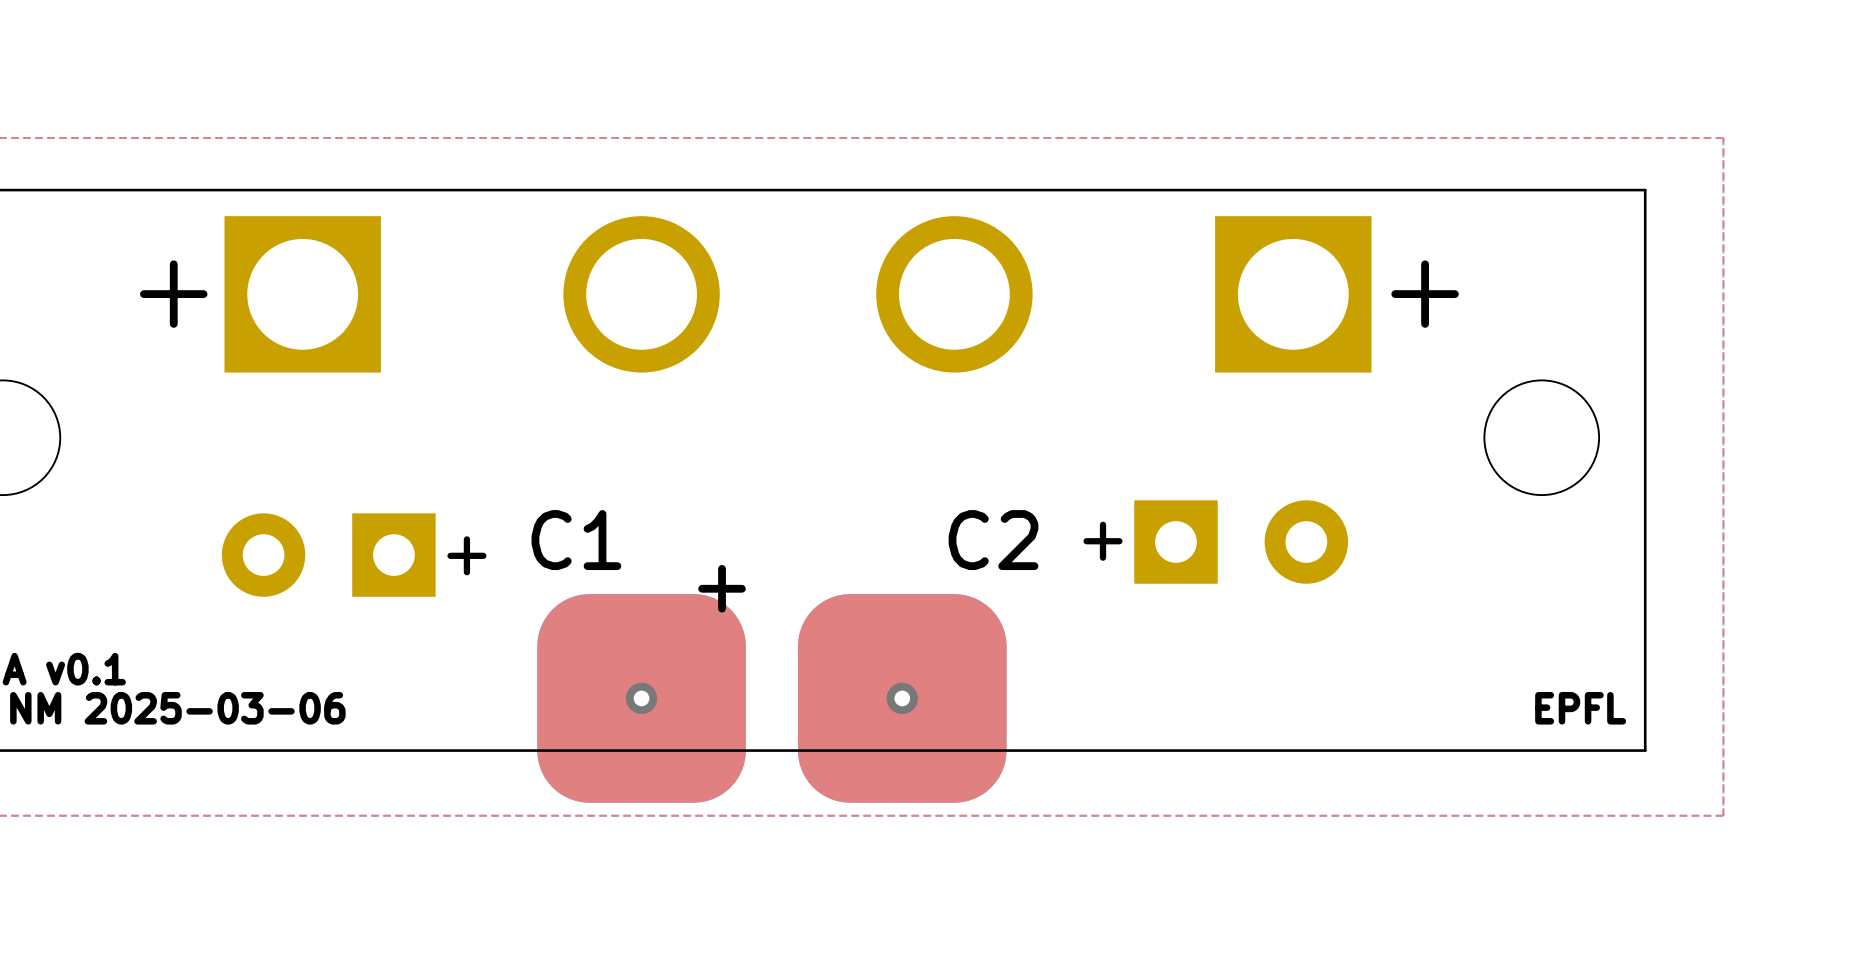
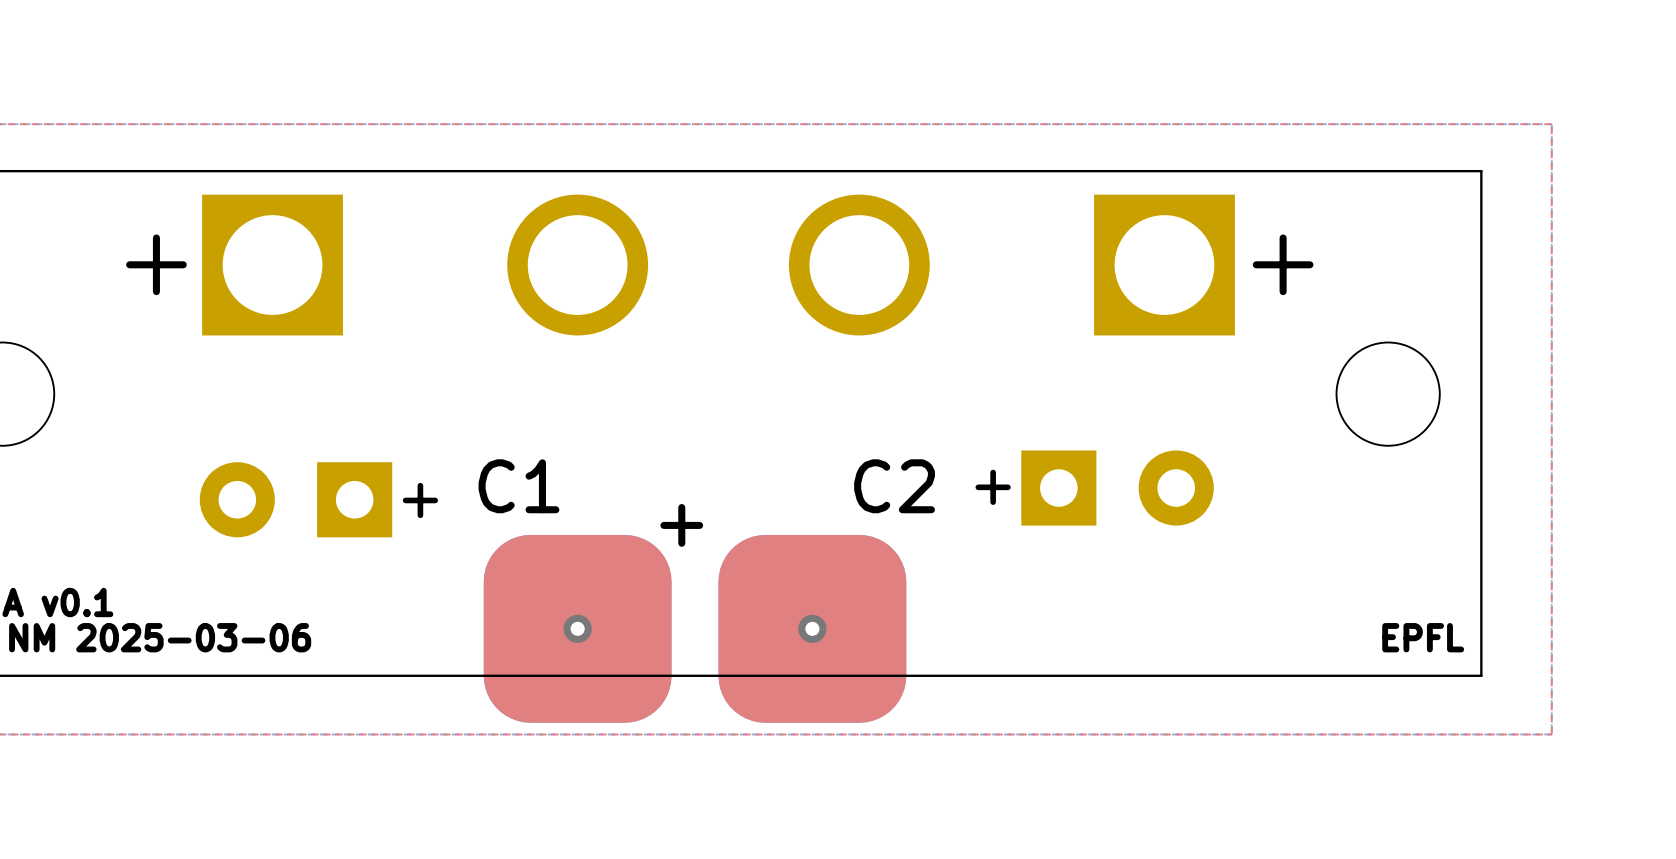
part text position: + (722, 588) -> + (681, 525)

